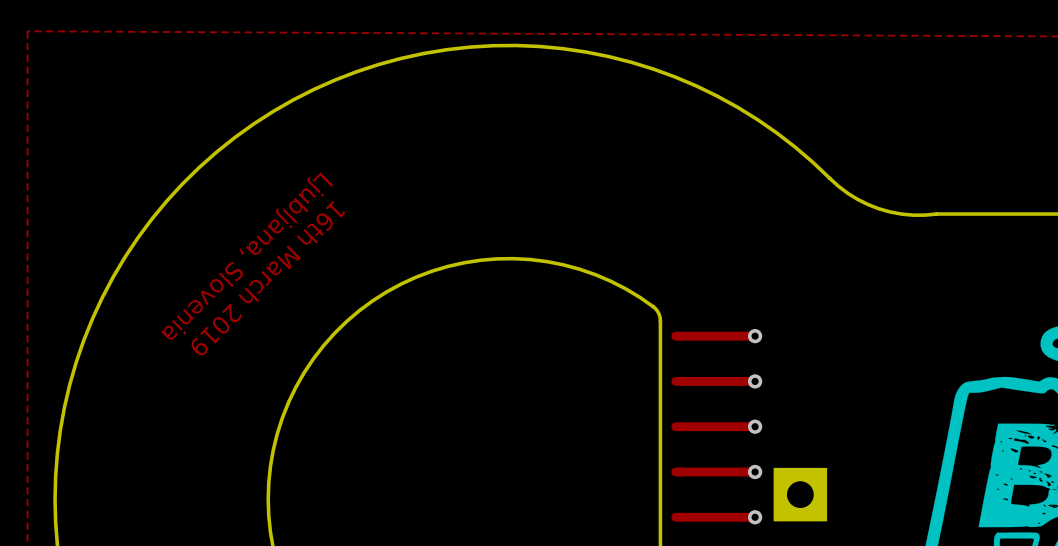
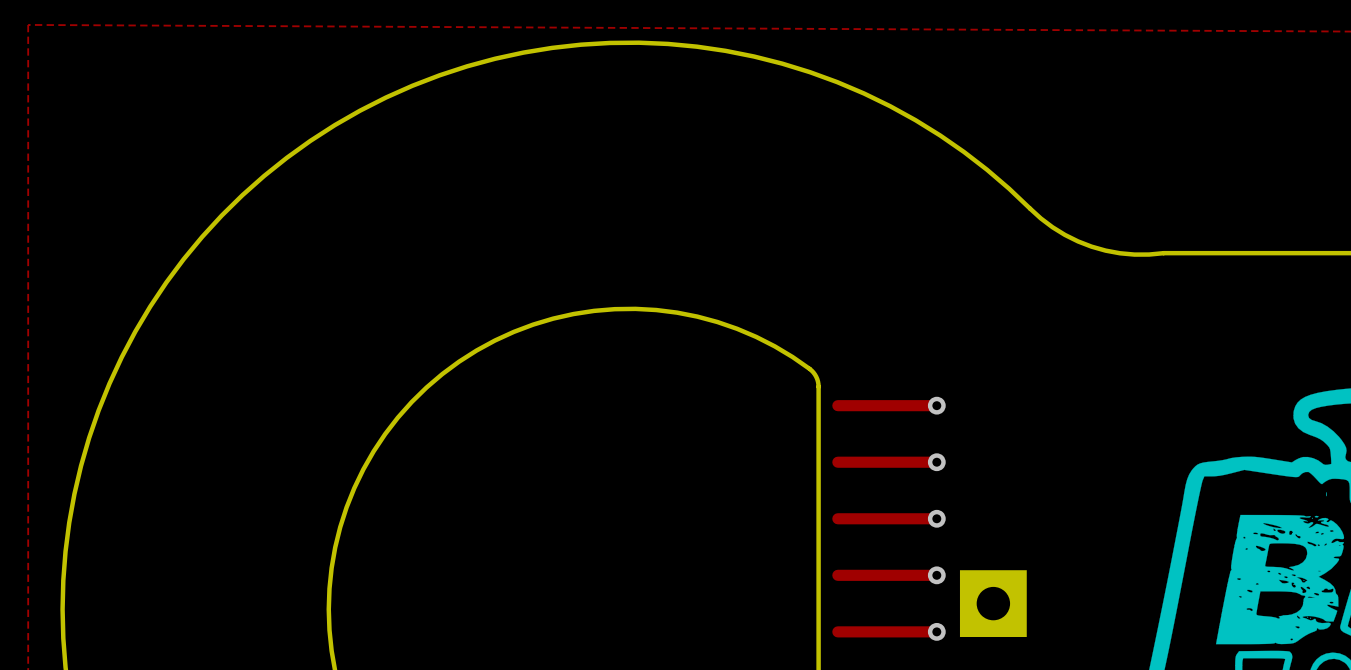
text: Ljubljana, Slovenia (247, 256) -> none
text: 16th March 2019 (268, 278) -> none

